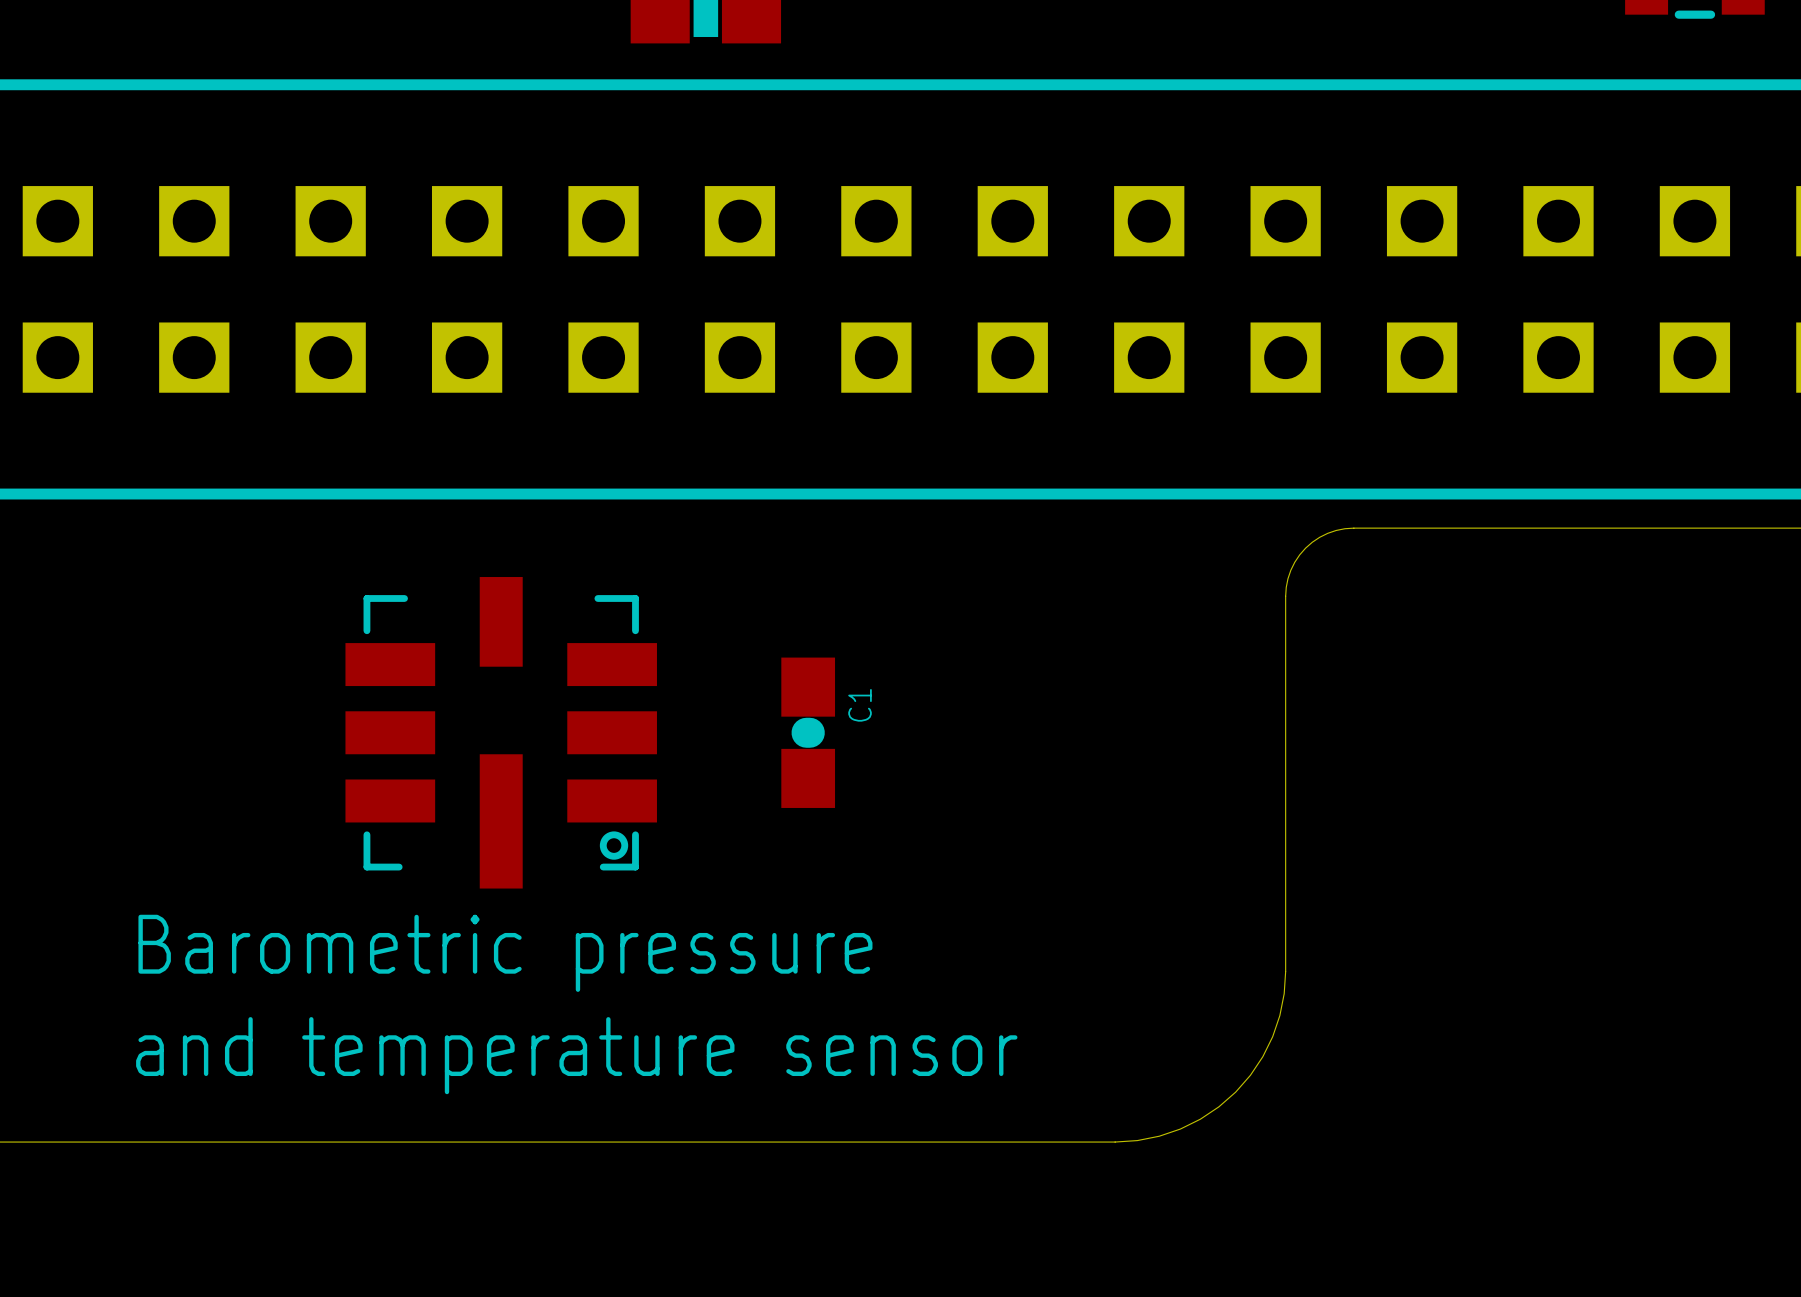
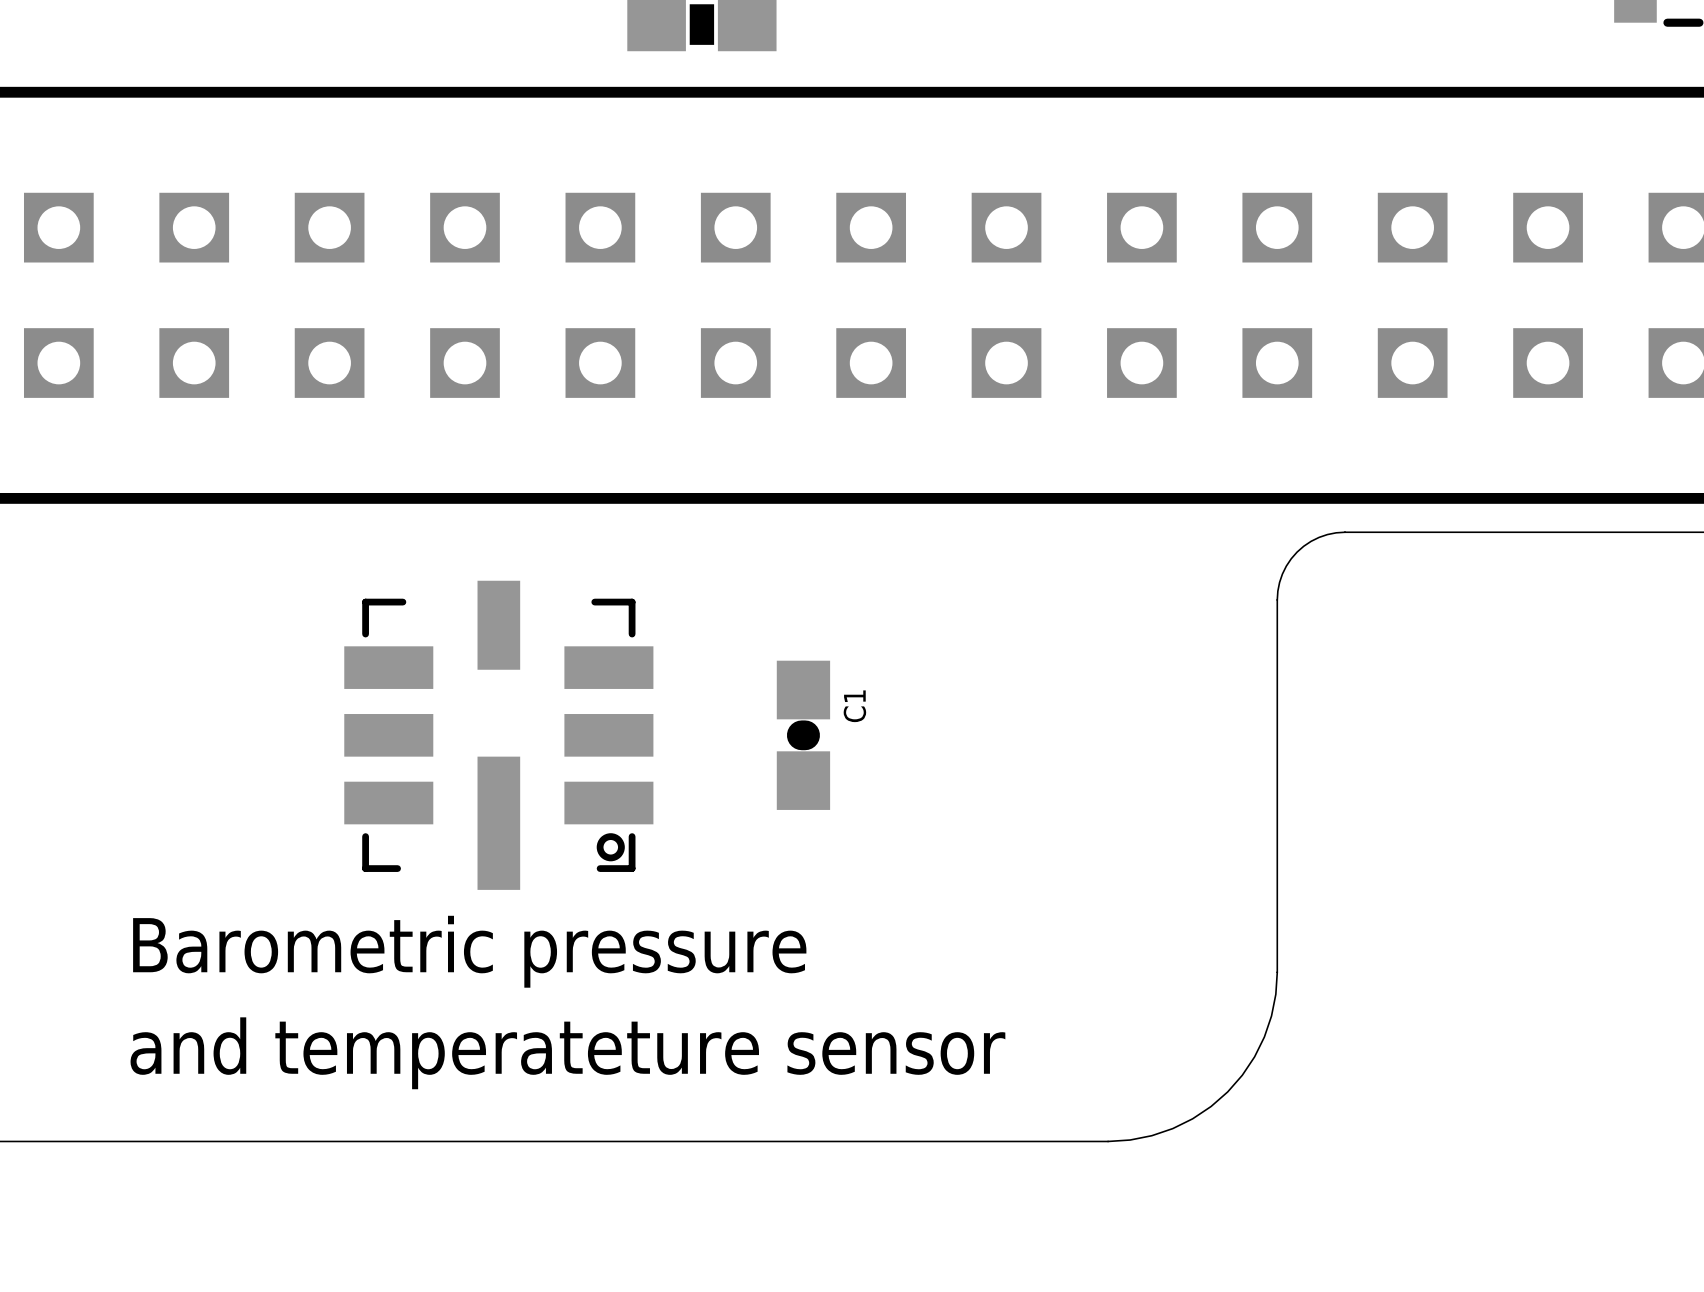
text: and temperature sensor (576, 1055) -> and temperateture sensor (567, 1053)

